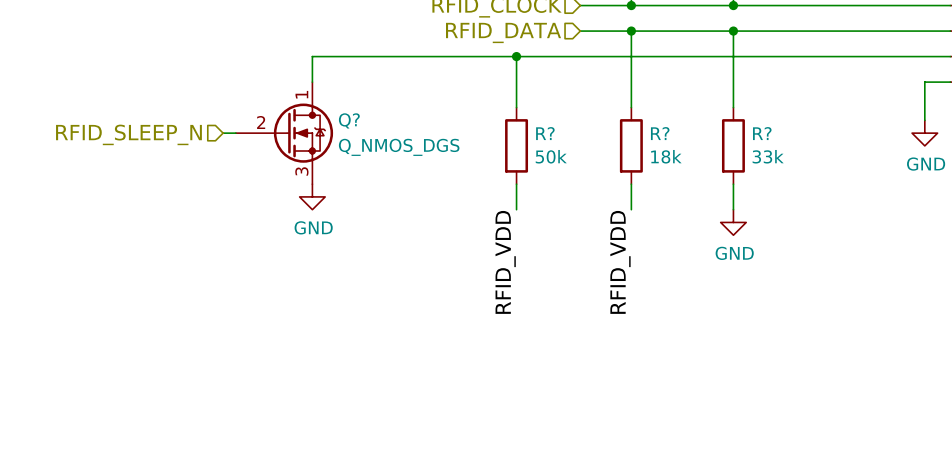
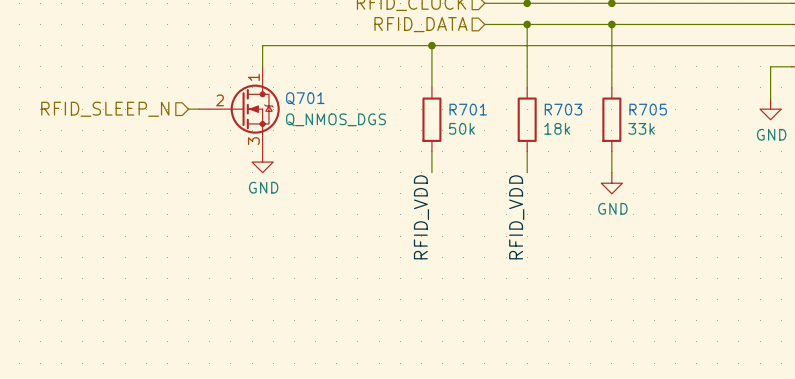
Q? name: Q? (349, 120) -> Q701 (305, 98)
R? name: R? (545, 133) -> R701 (468, 109)
R? name: R? (660, 133) -> R703 (563, 109)
R? name: R? (762, 133) -> R705 (648, 109)

